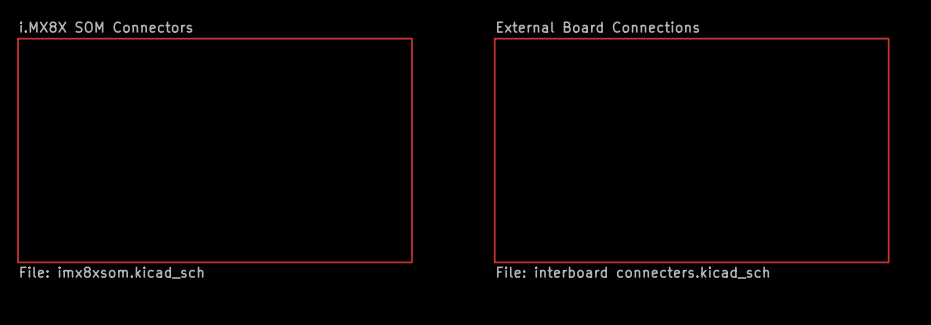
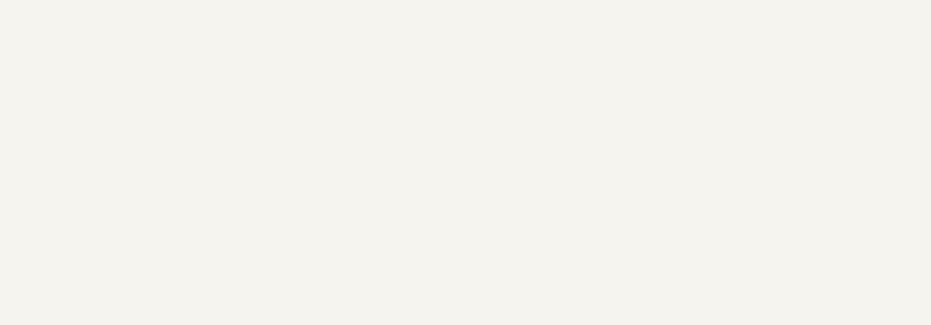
sheet i.MX8X SOM Connectors: File: imx8xsom.kicad_sch (215, 150) -> none
sheet External Board Connections: File: interboard connecters.kicad_sch (691, 150) -> none

